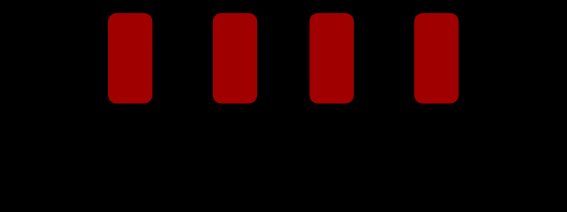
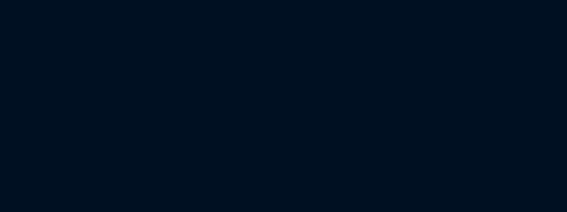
part: (182, 58) -> none
part: (384, 58) -> none

